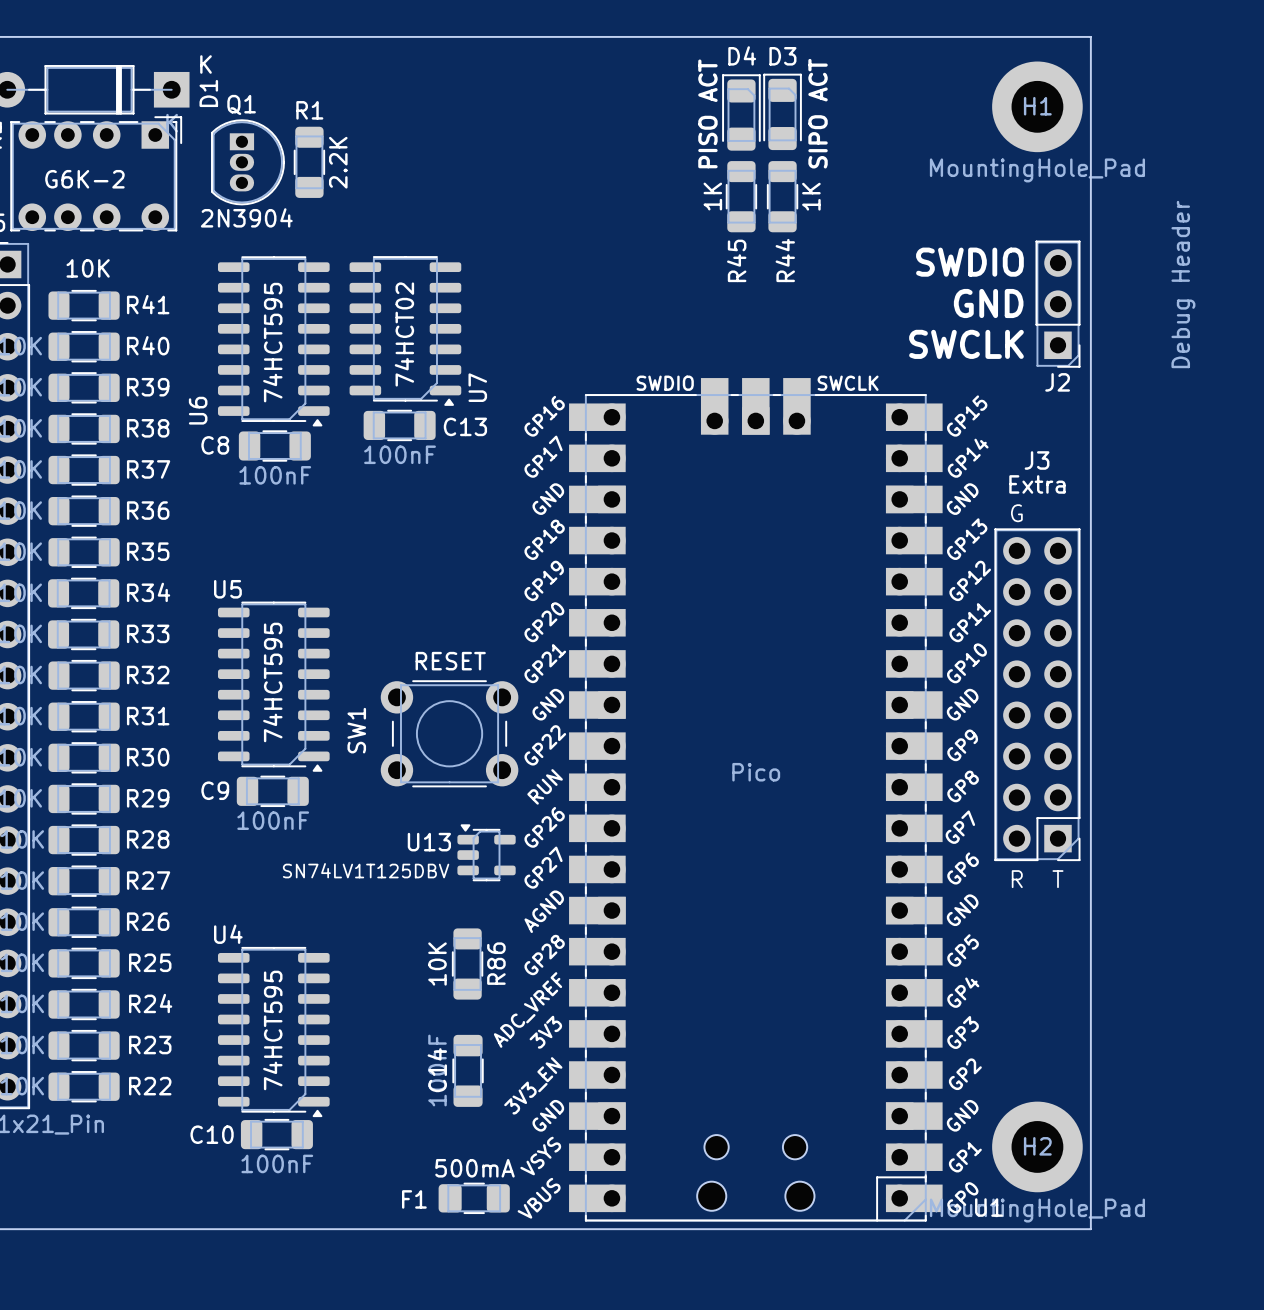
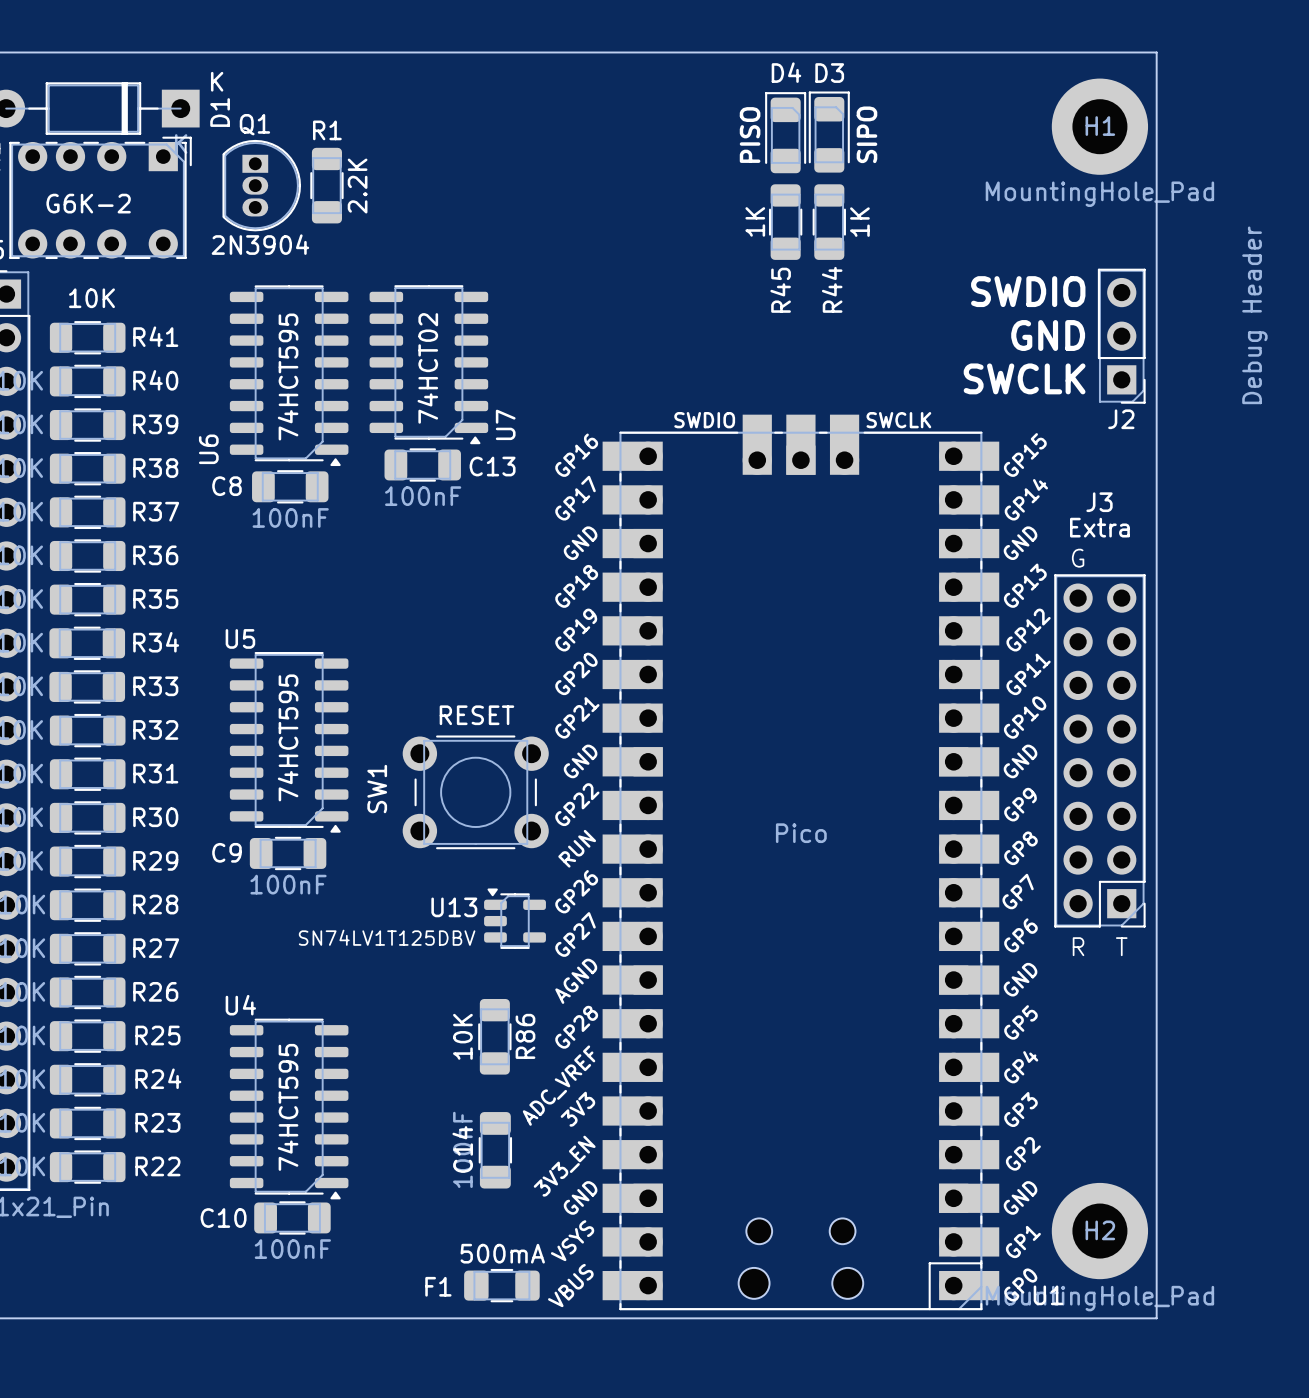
D4 value: PISO ACT (707, 113) -> PISO (750, 135)
D3 value: SIPO ACT (818, 113) -> SIPO (866, 134)

